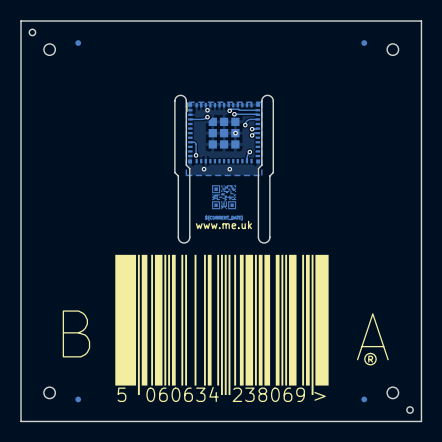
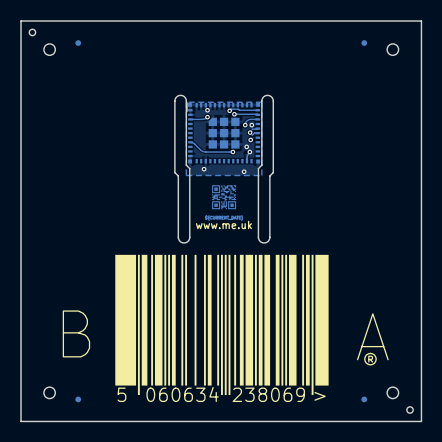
via: none -> (251, 125)
via: (252, 129) -> none
via: none -> (250, 132)
via: (235, 133) -> none
via: (252, 135) -> none
via: none -> (250, 140)
track: (190, 142) (195, 143) (196, 155) -> (190, 142) (203, 151) (232, 152)
via: none -> (246, 146)
via: none -> (232, 152)
via: (196, 155) -> none
via: (229, 169) -> none
via: none -> (244, 171)

